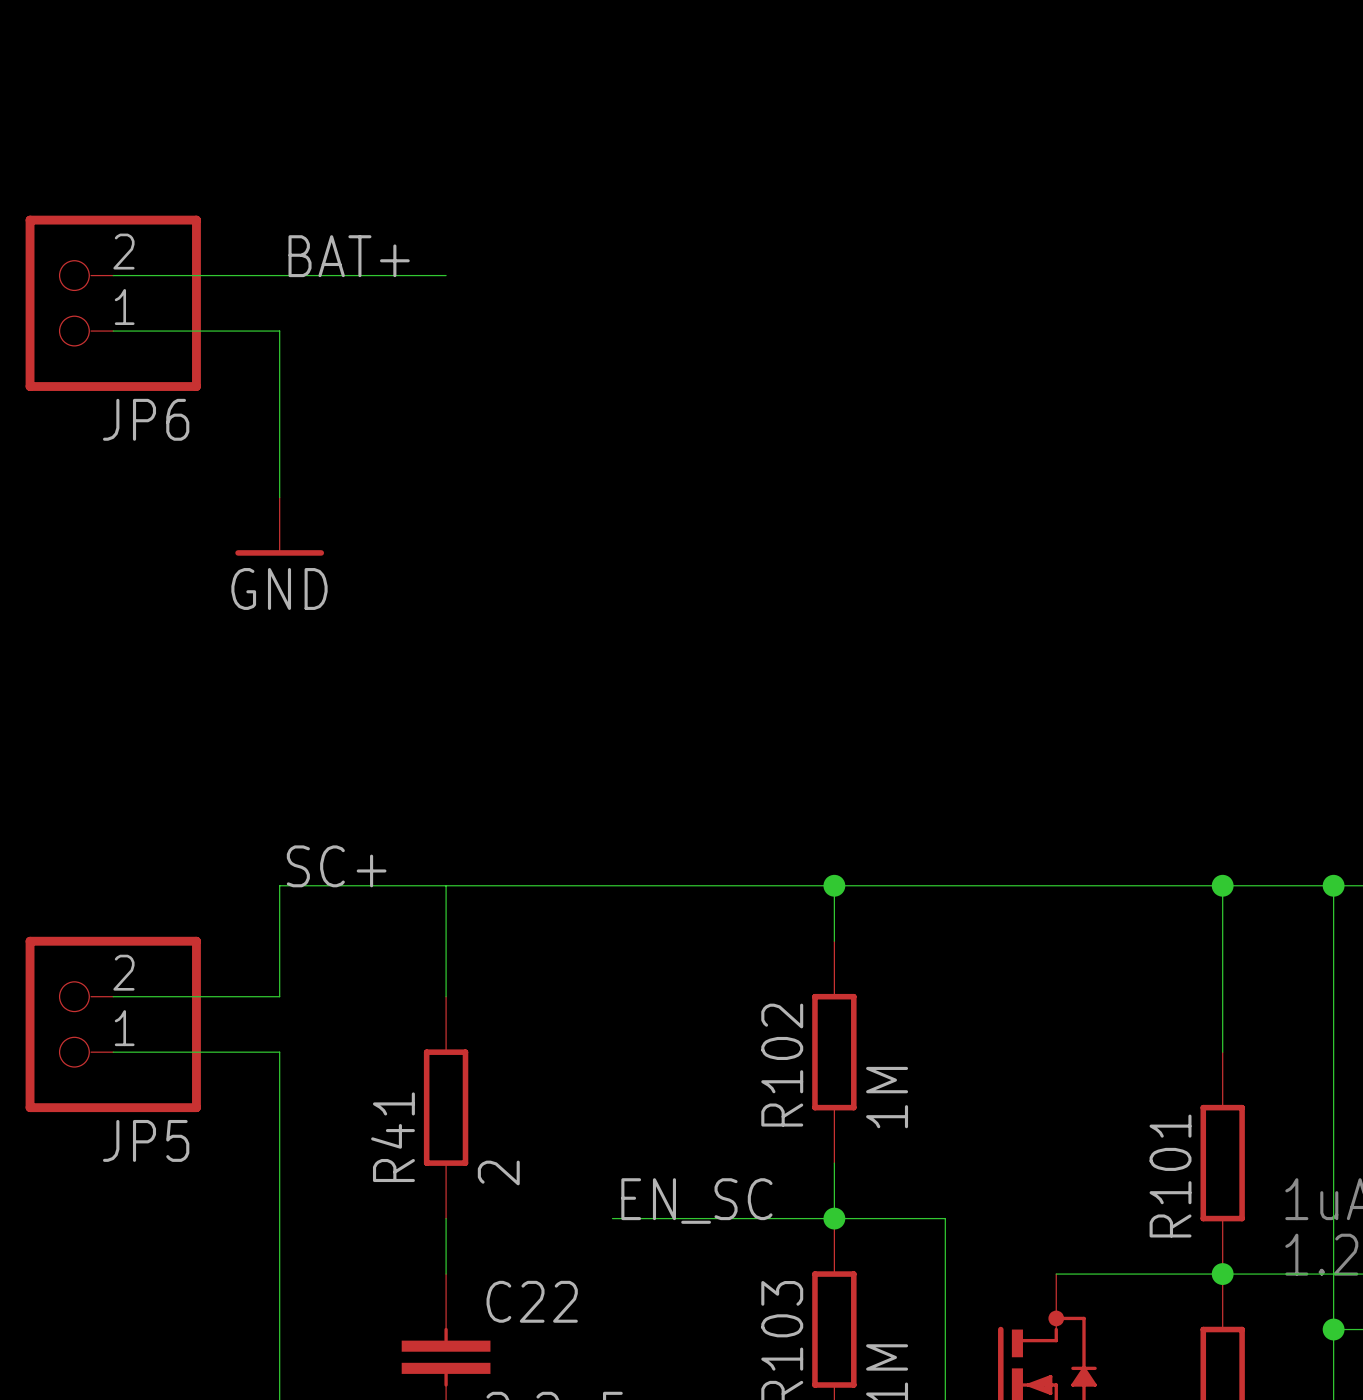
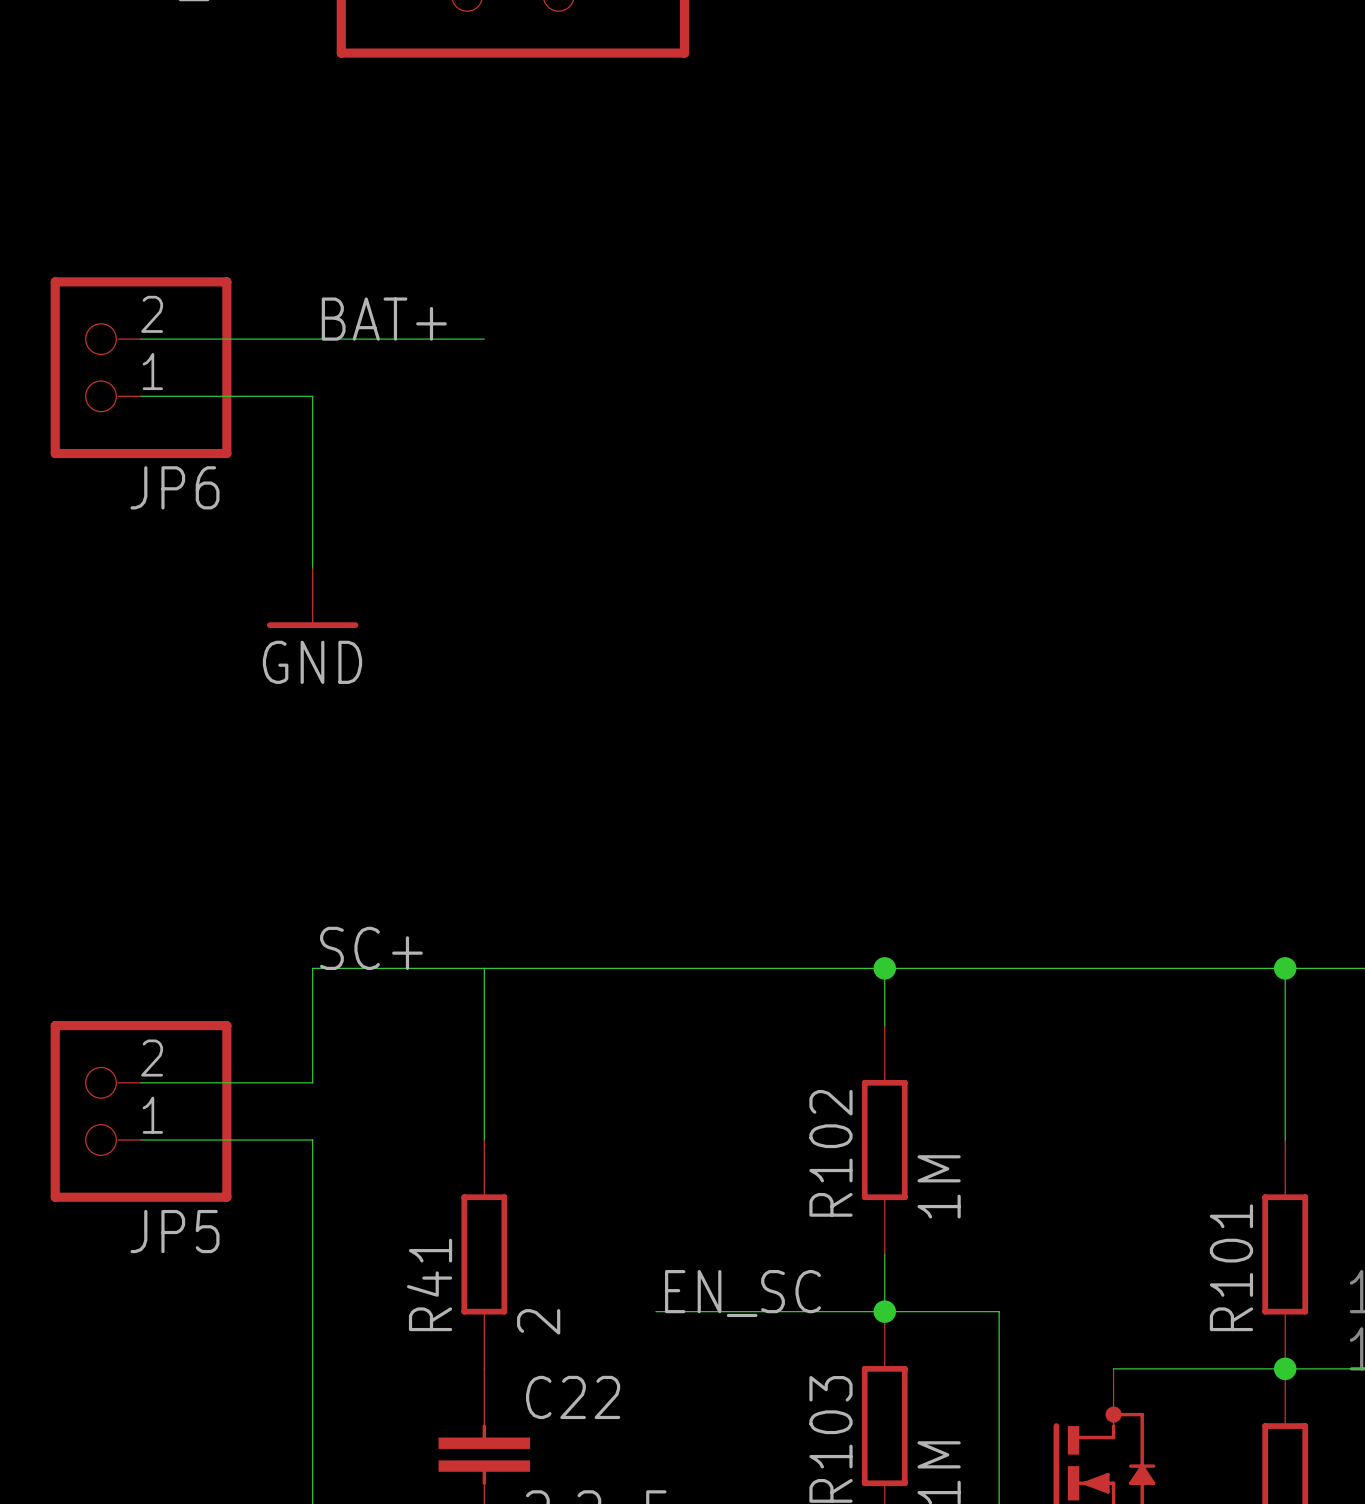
R41 position: (446, 1107) -> (484, 1254)

